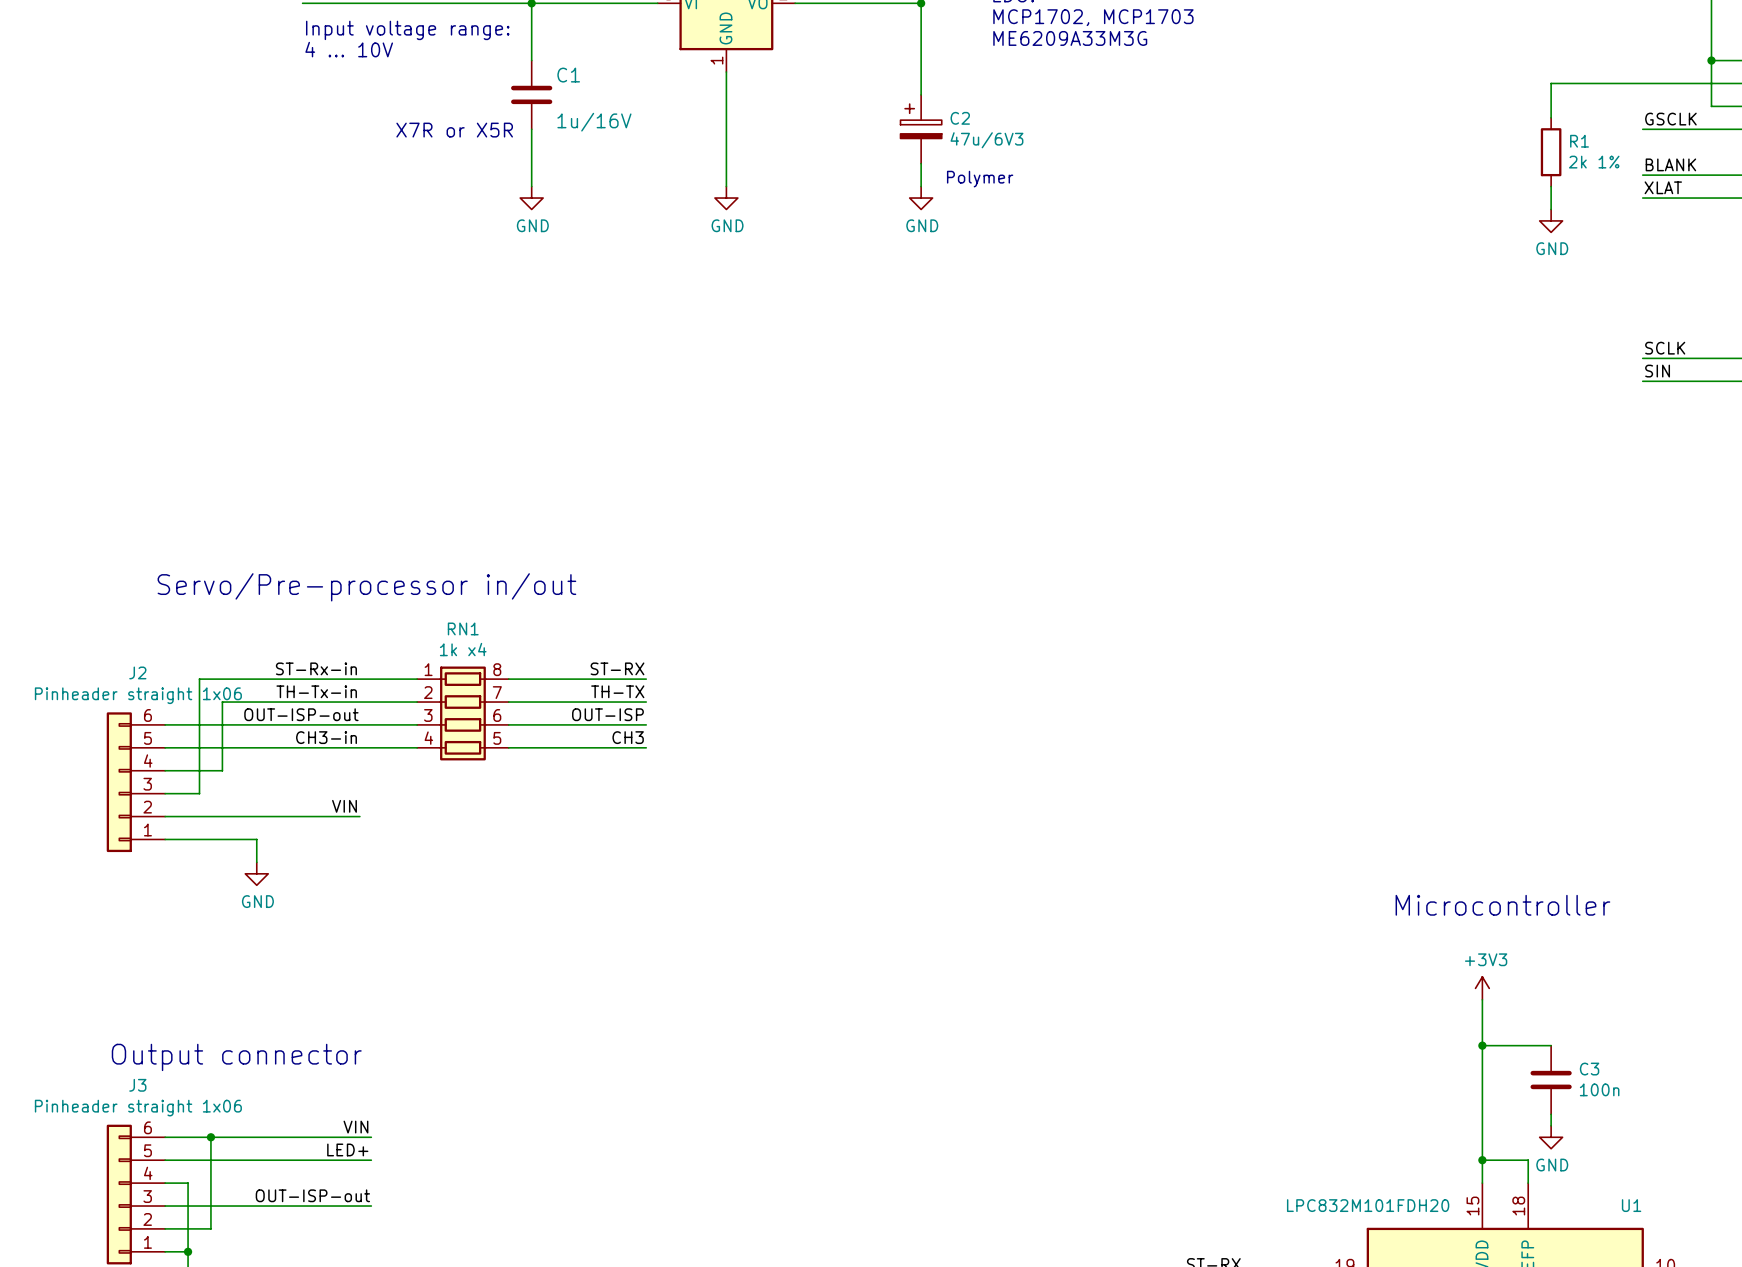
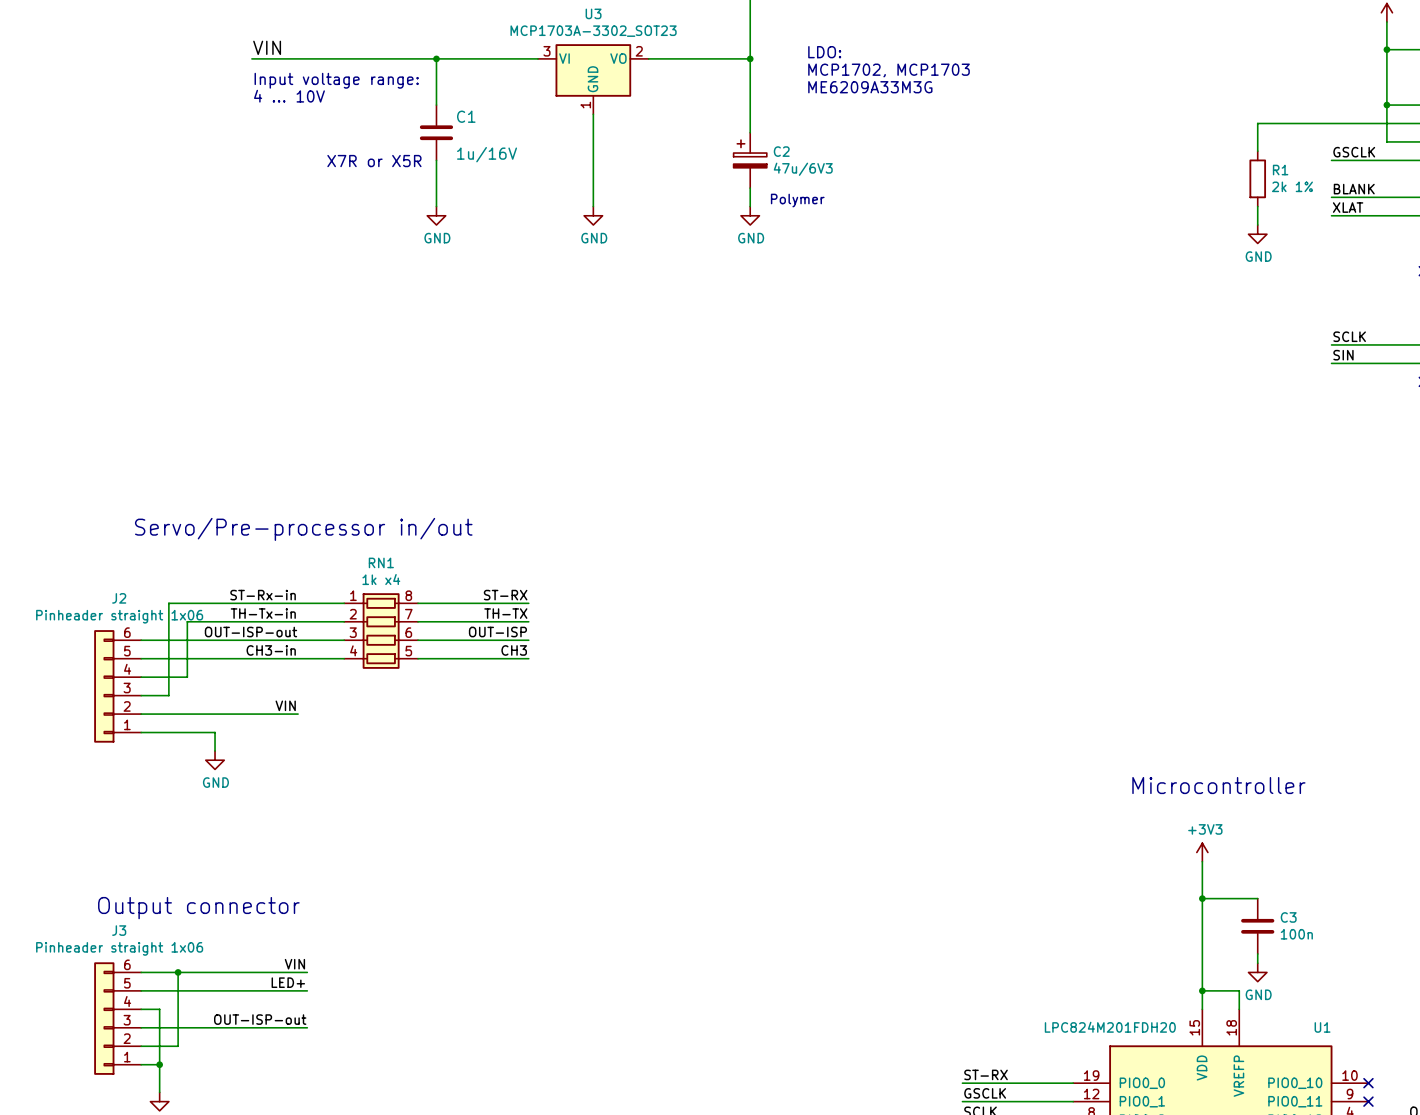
U1 value: LPC832M101FDH20 (1368, 1205) -> LPC824M201FDH20 (1110, 1027)

